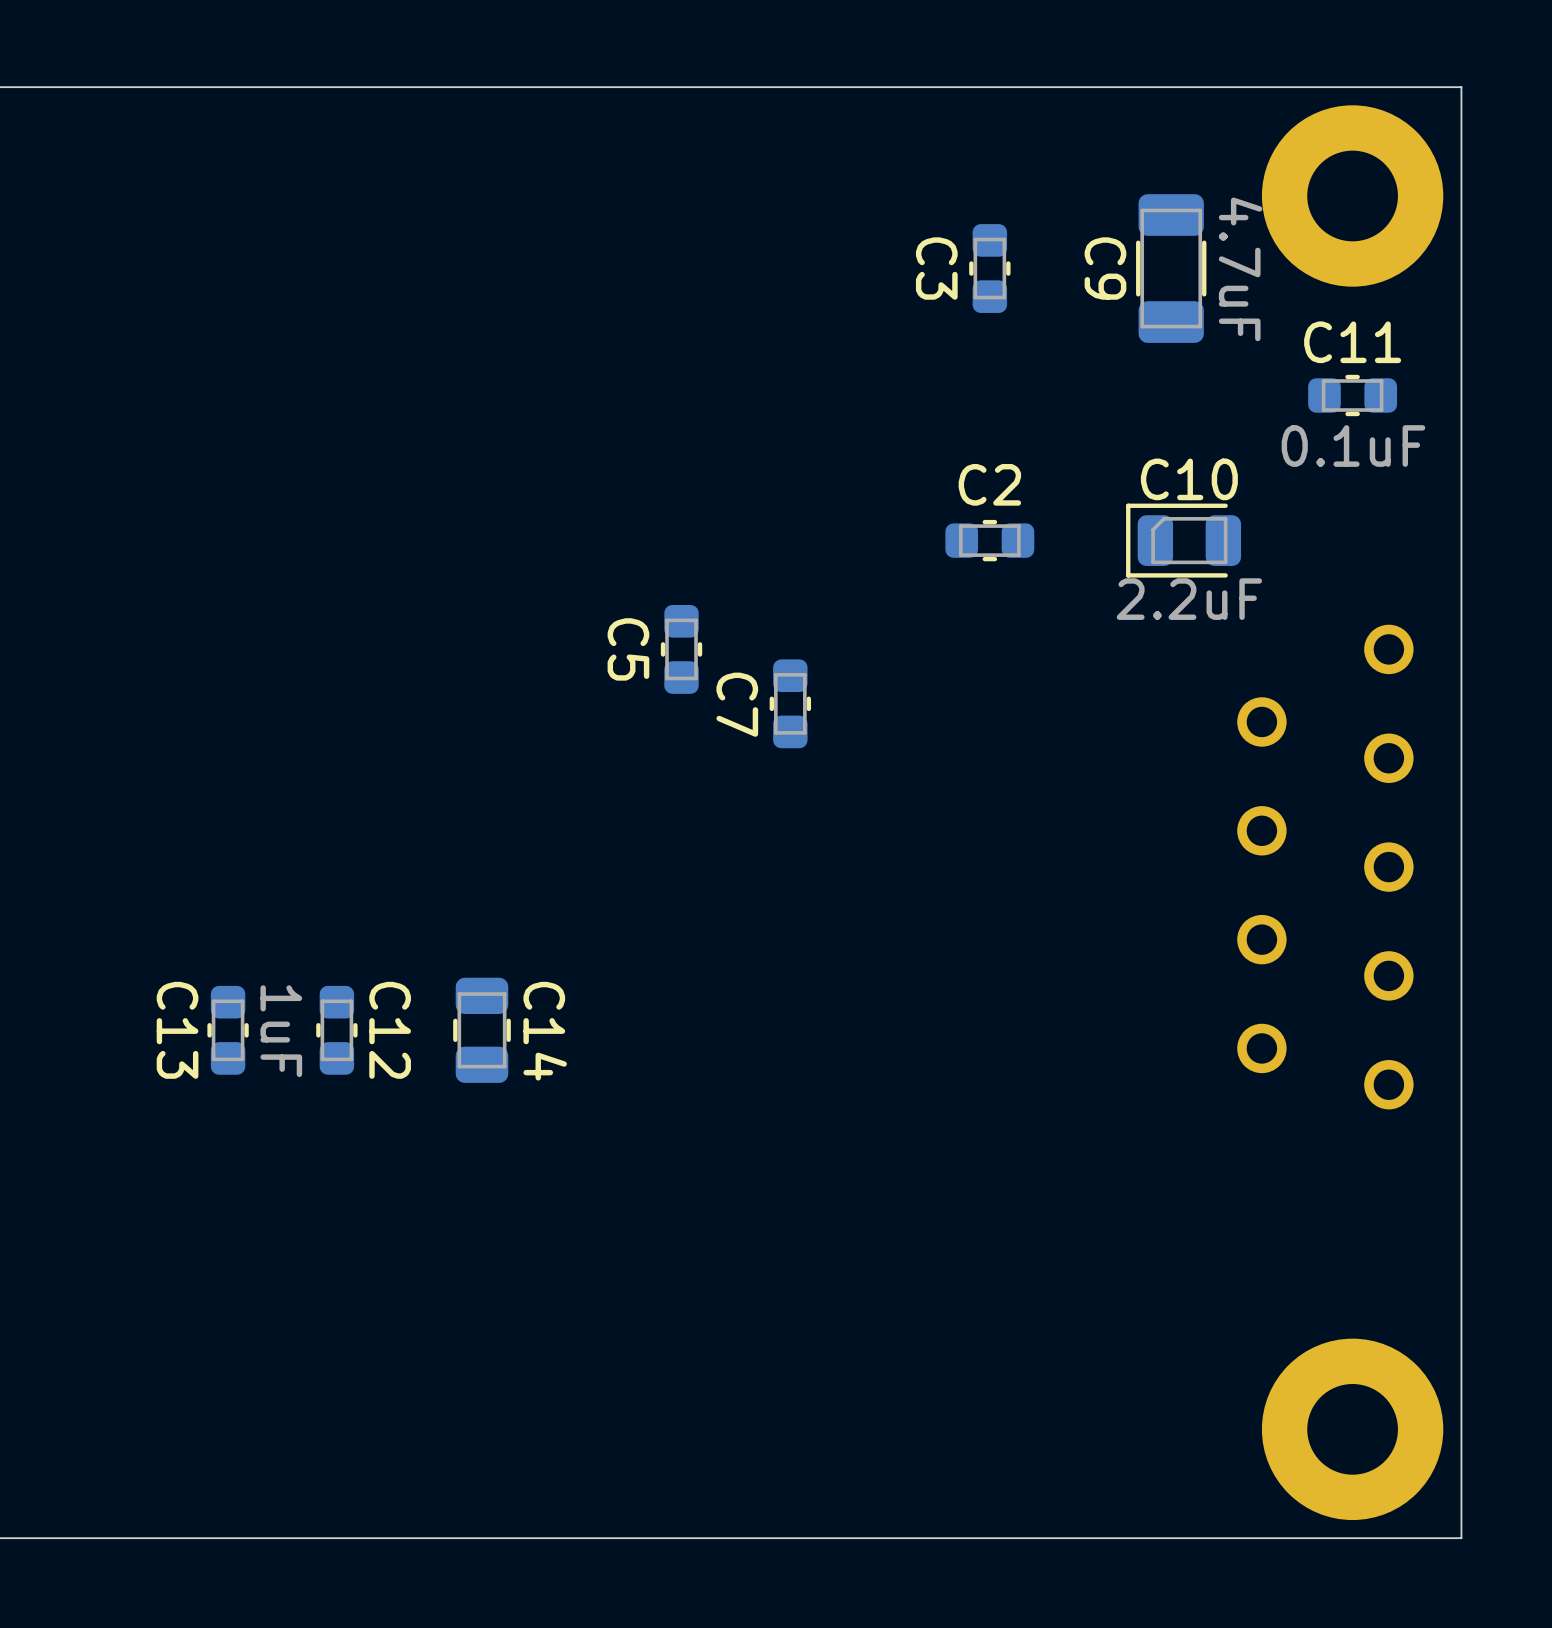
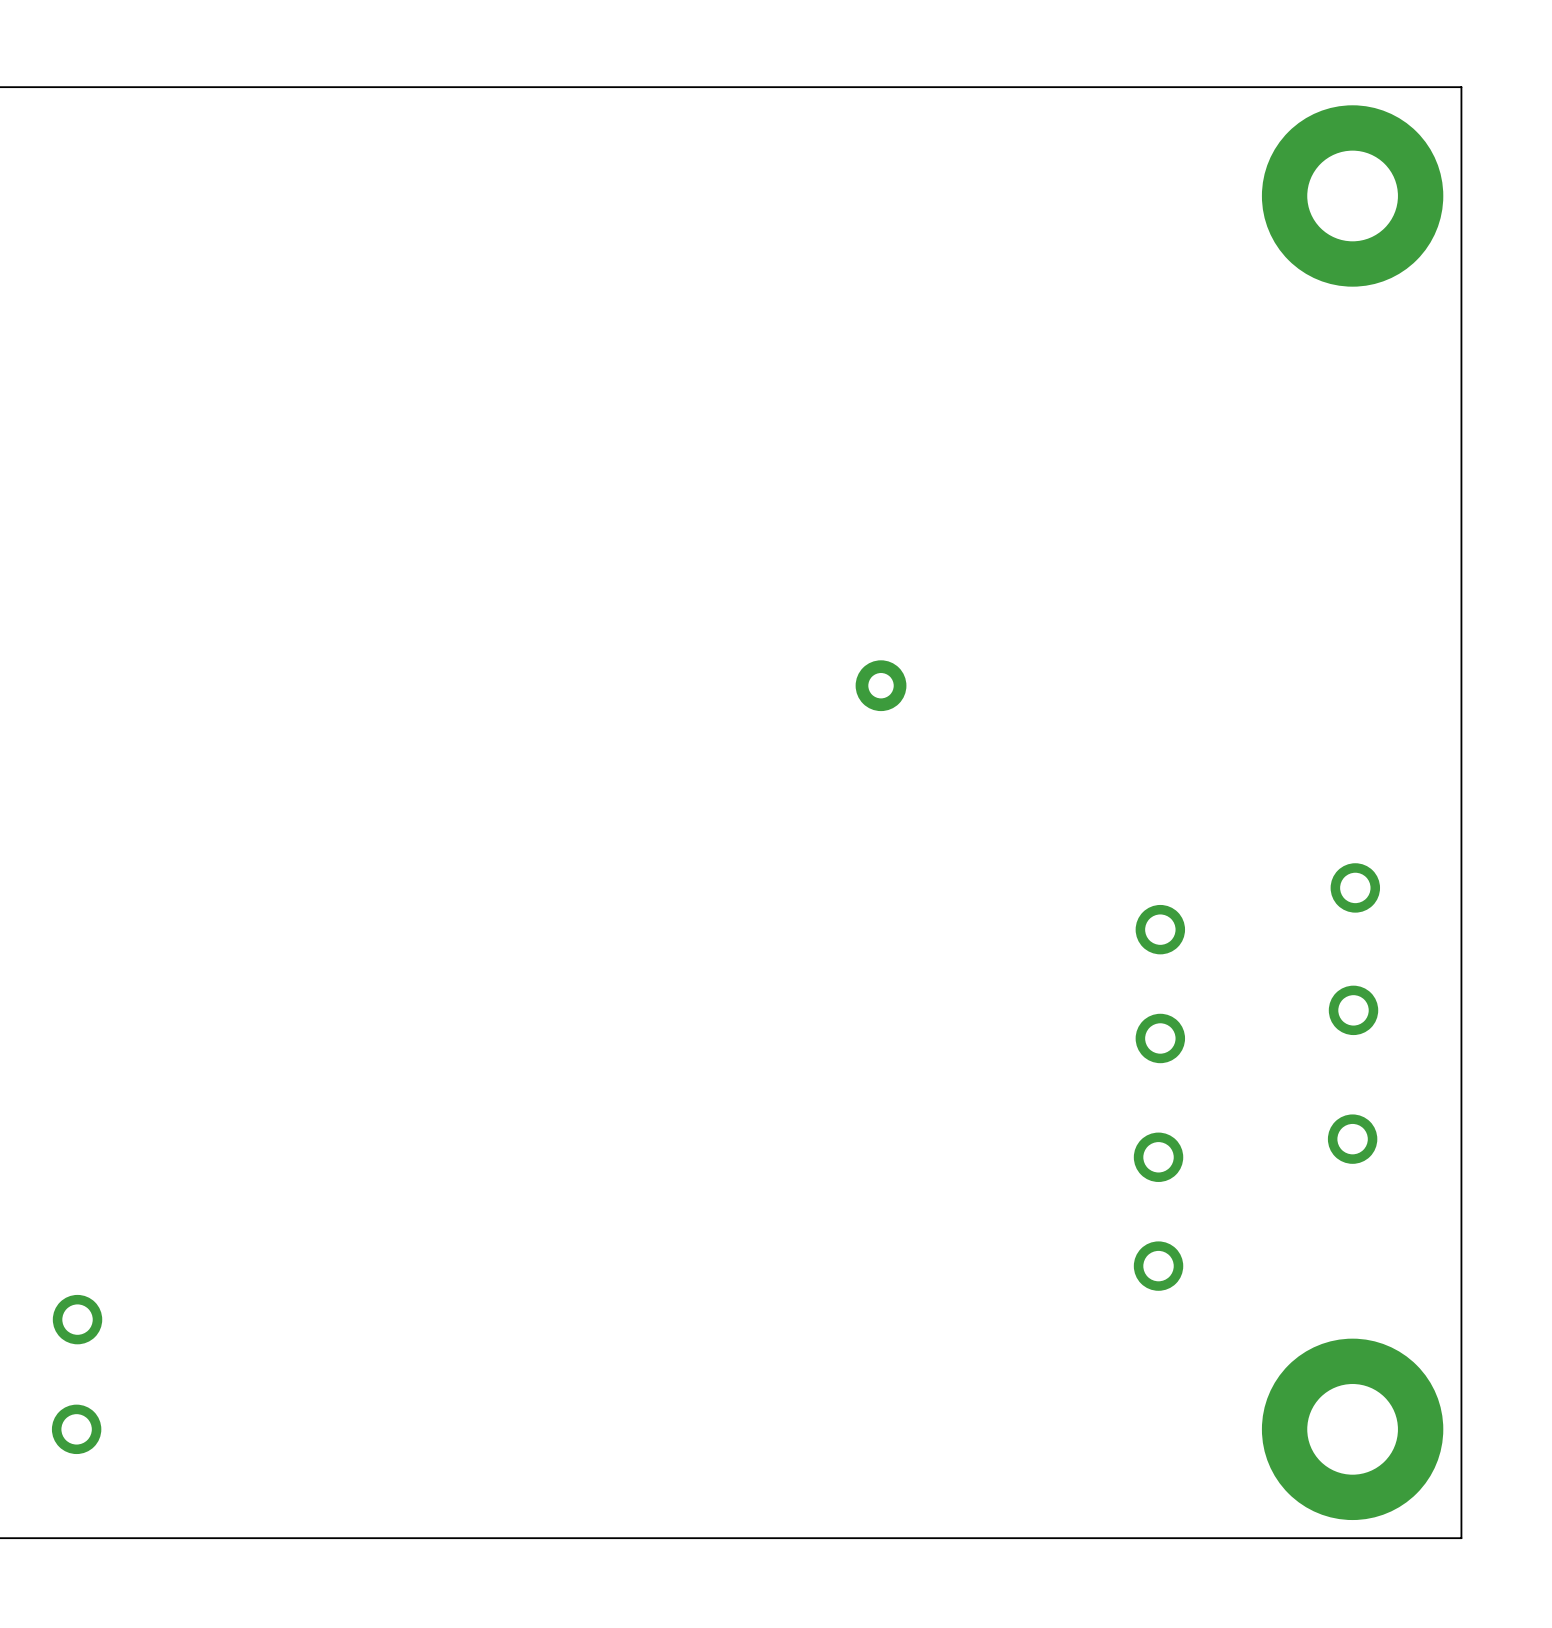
C3: (989, 268) -> none
C9: 4.7uF (1171, 268) -> none
C11: 0.1uF (1352, 395) -> none
C2: (989, 540) -> none
C10: 2.2uF (1183, 540) -> none
C5: (681, 649) -> none
part: (1388, 649) -> none
part: none -> (881, 685)
C7: (790, 703) -> none
part: (1261, 721) -> none
part: (1388, 758) -> none
part: (1261, 830) -> none
part position: (1388, 867) -> (1355, 887)
part: none -> (1160, 929)
part: (1261, 939) -> none
part: (1388, 975) -> none
part: none -> (1353, 1010)
C13: 1uF (228, 1030) -> none
C12: (336, 1030) -> none
C14: (481, 1030) -> none
part: none -> (1160, 1038)
part: (1261, 1048) -> none
part: (1388, 1084) -> none
part: none -> (1352, 1139)
part: none -> (1158, 1157)
part: none -> (1158, 1266)
part: none -> (77, 1319)
part: none -> (76, 1429)

